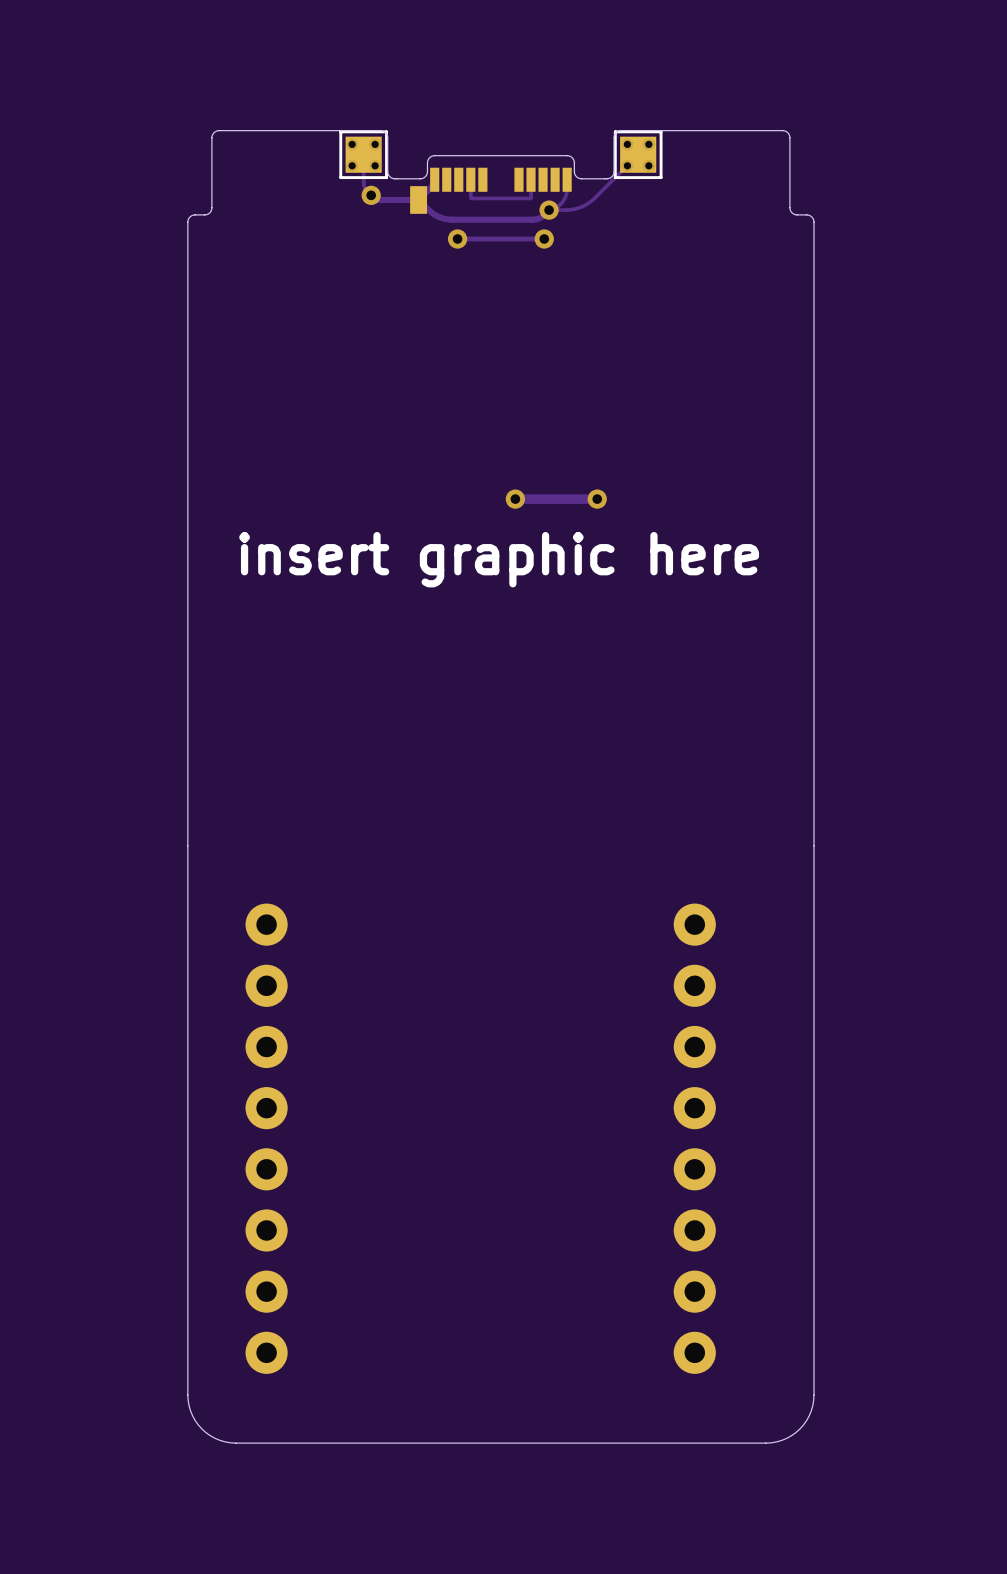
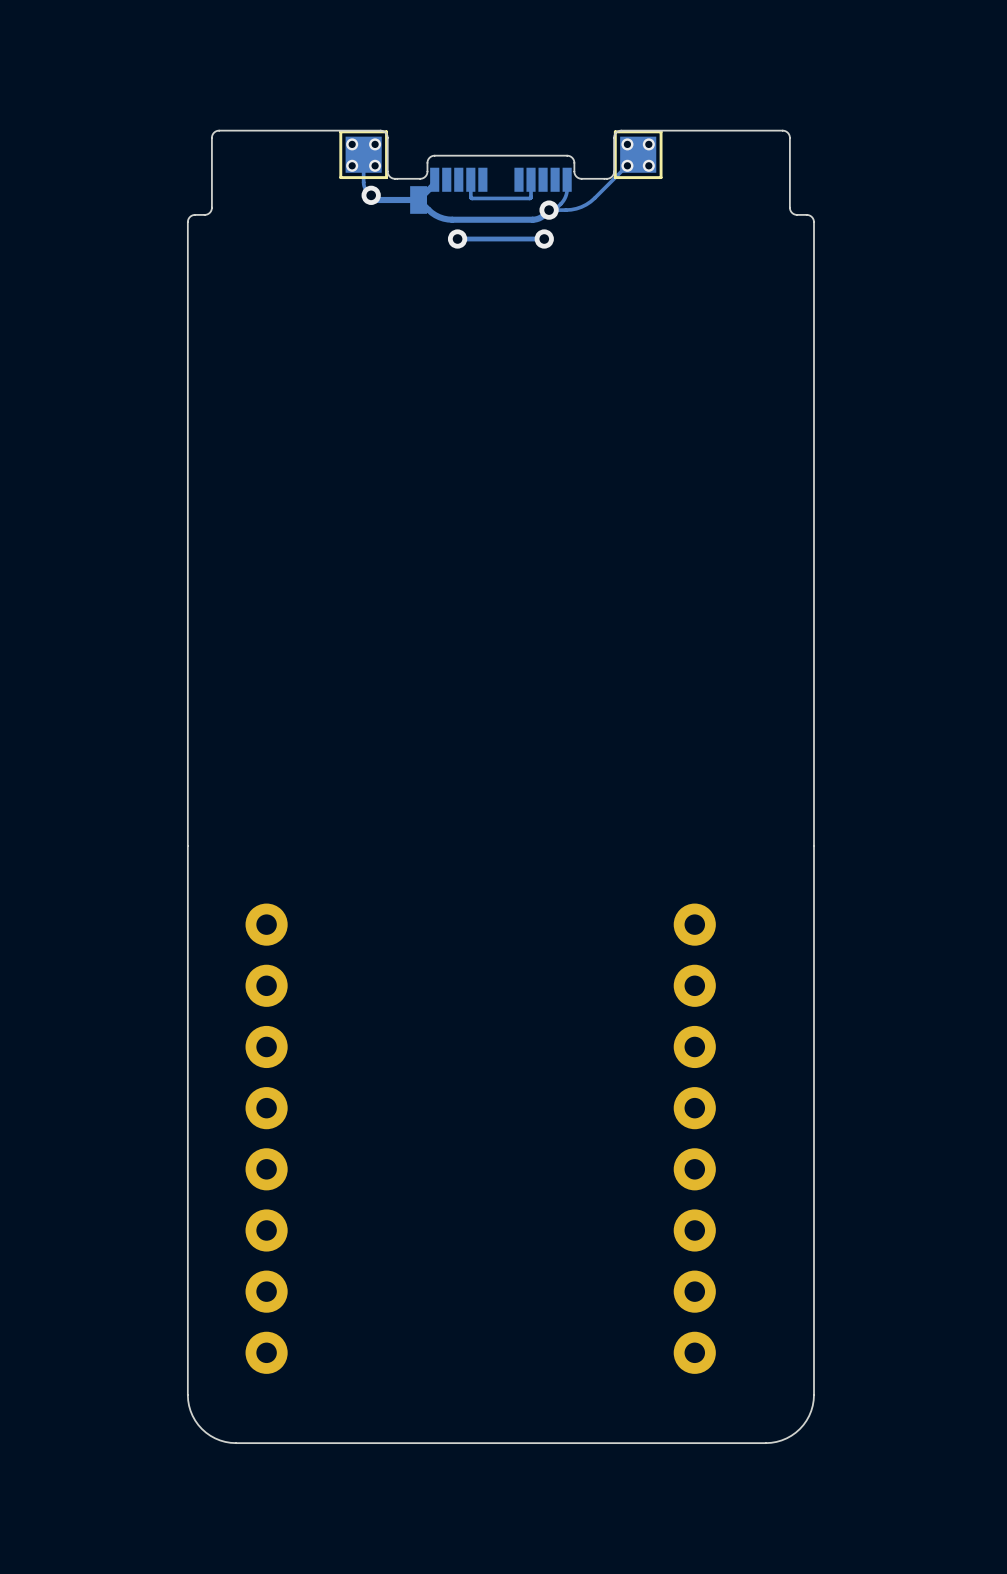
via: (515, 499) -> none
track: (597, 499) (515, 499) -> none
via: (597, 499) -> none
text: insert graphic here (499, 559) -> none

